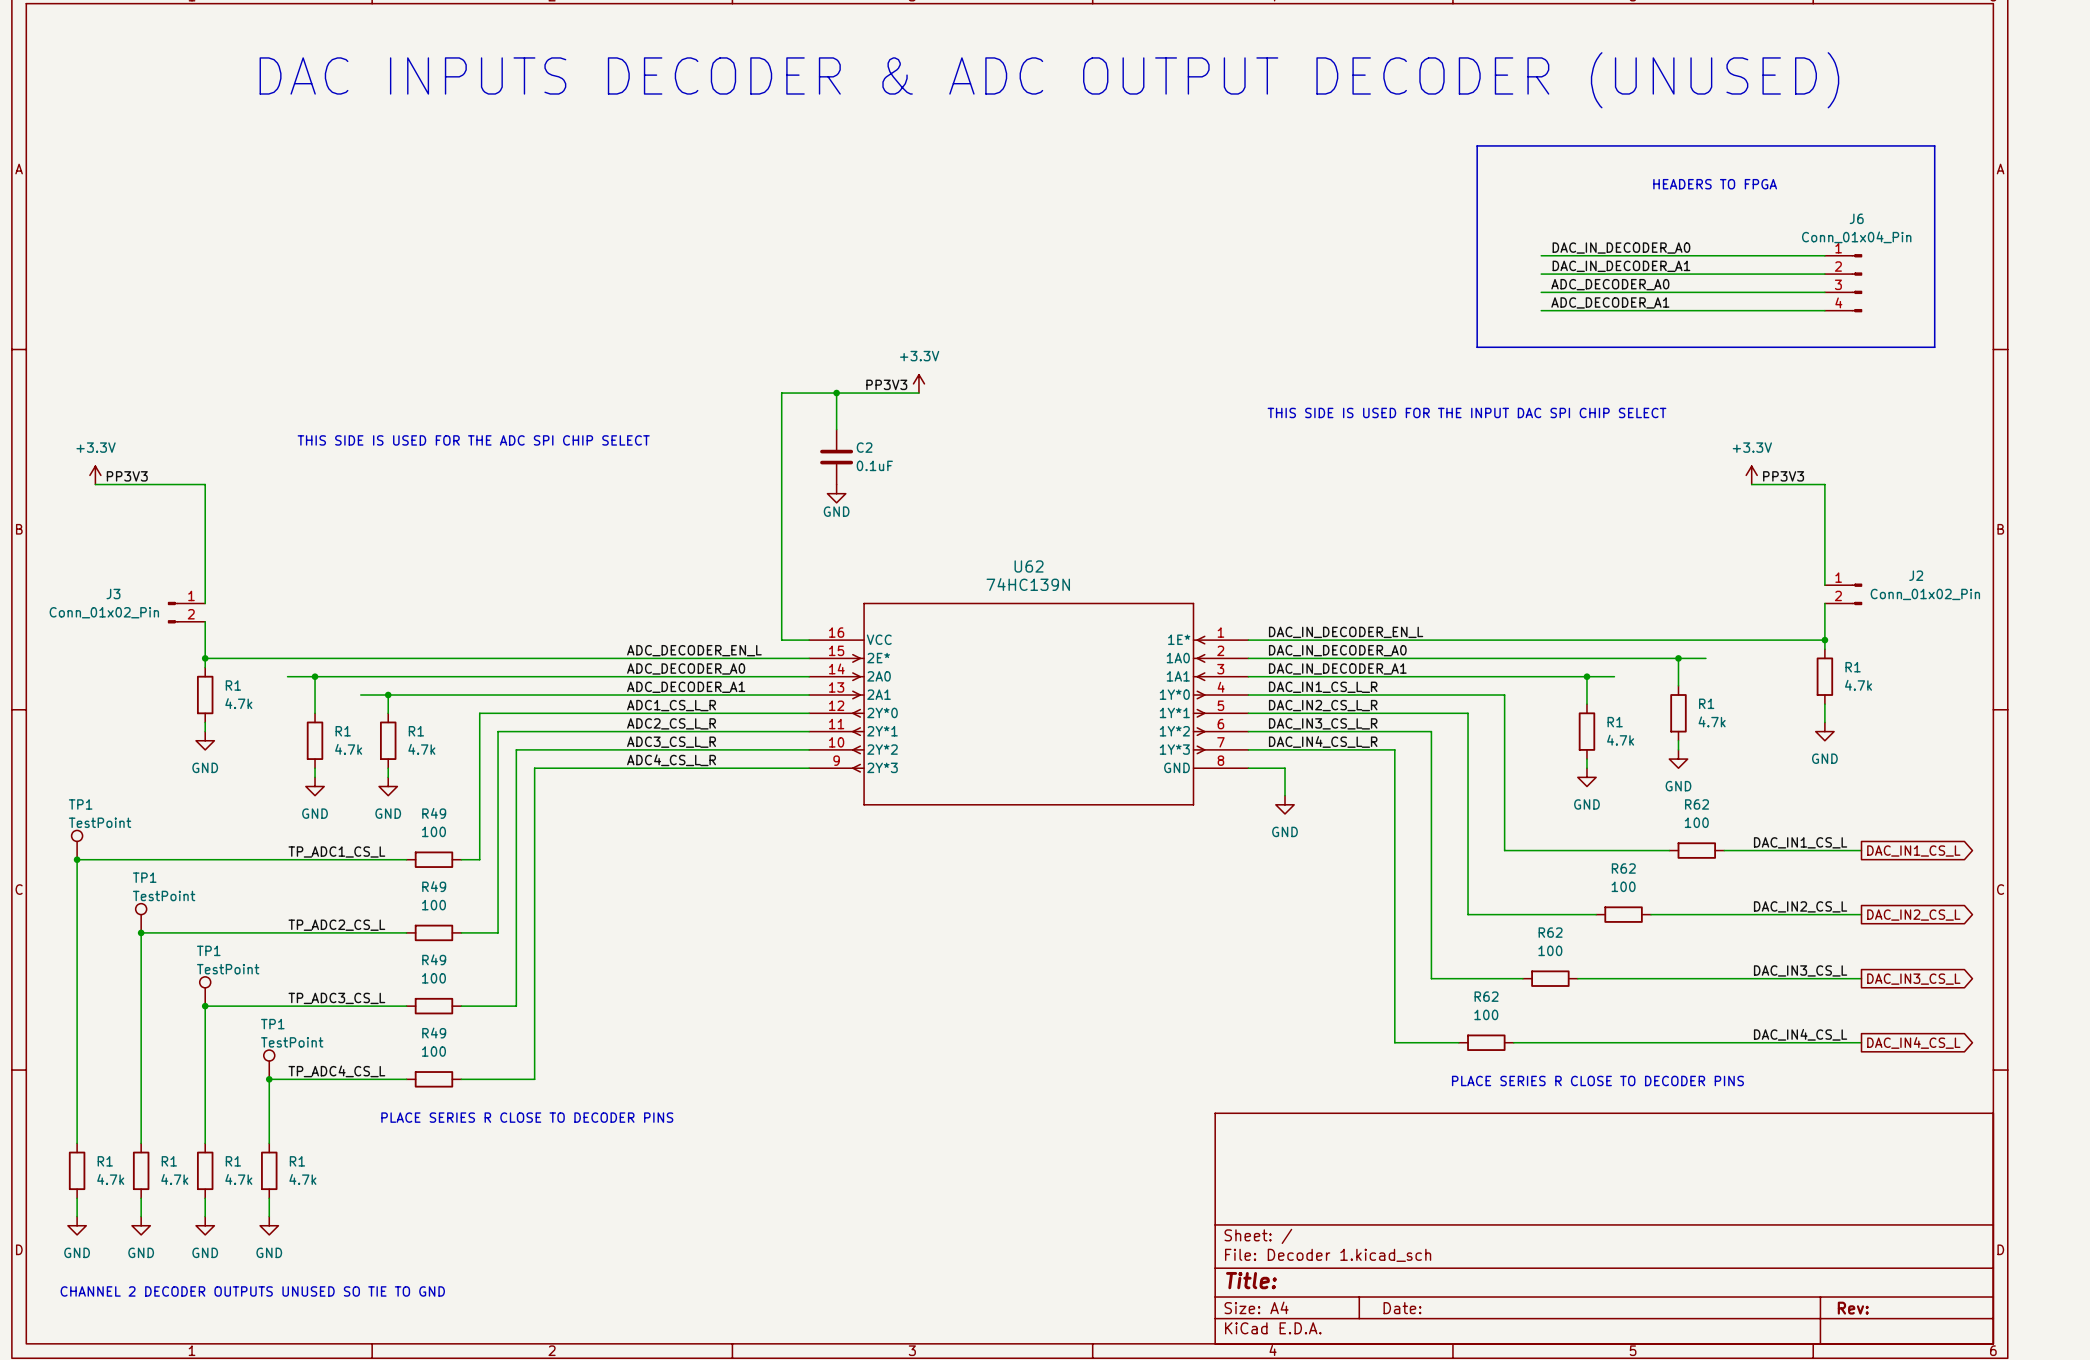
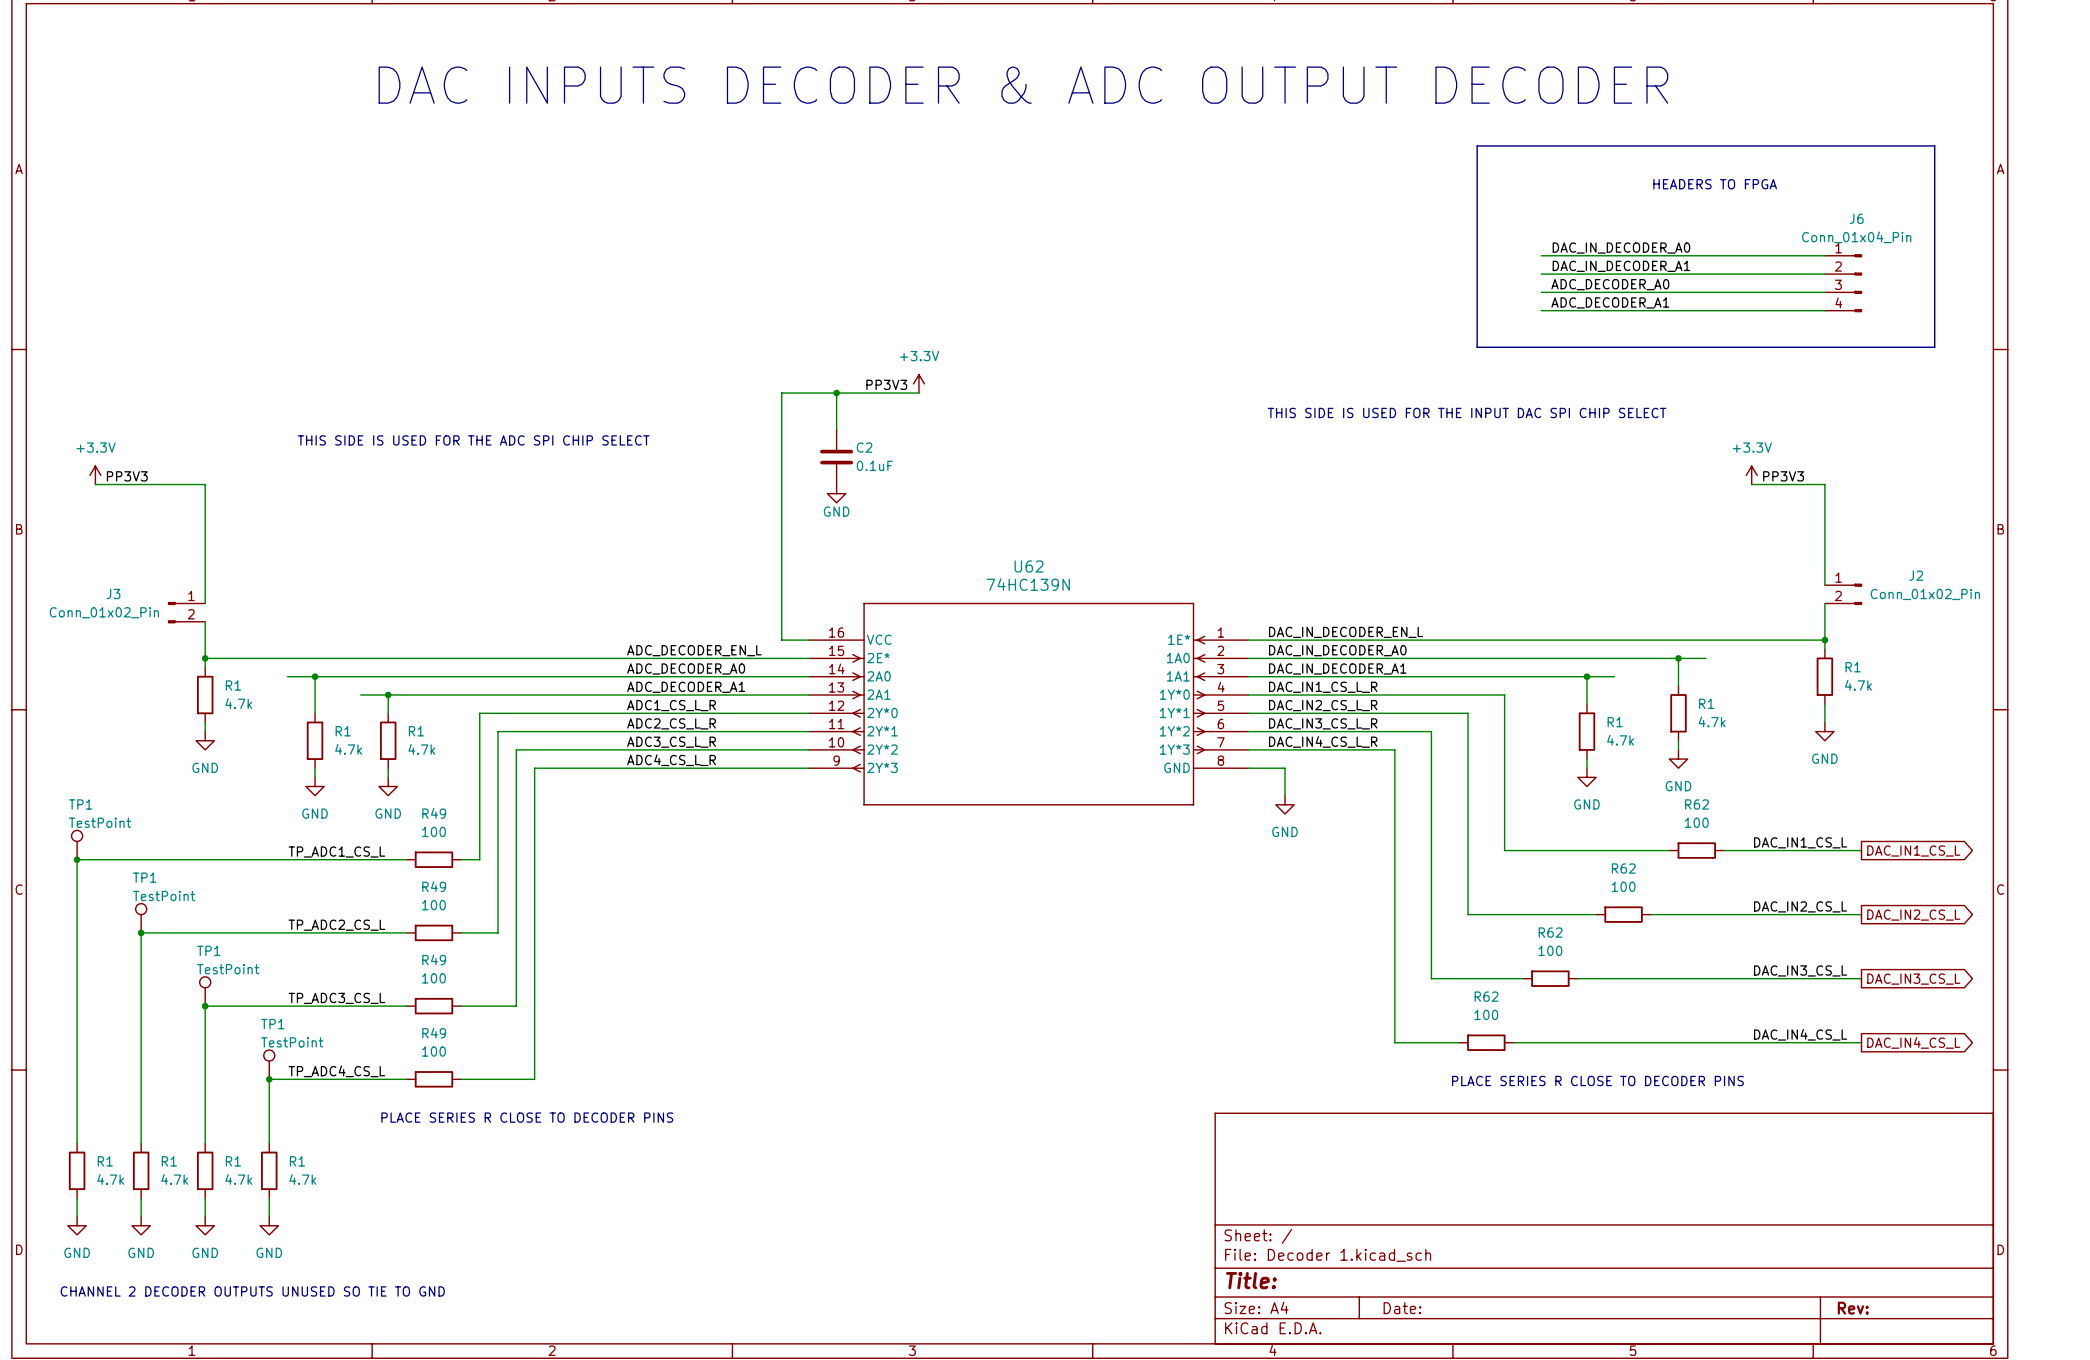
text: DAC INPUTS DECODER & ADC OUTPUT DECODER (UNUSED) (1049, 80) -> DAC INPUTS DECODER & ADC OUTPUT DECODER (1023, 85)

